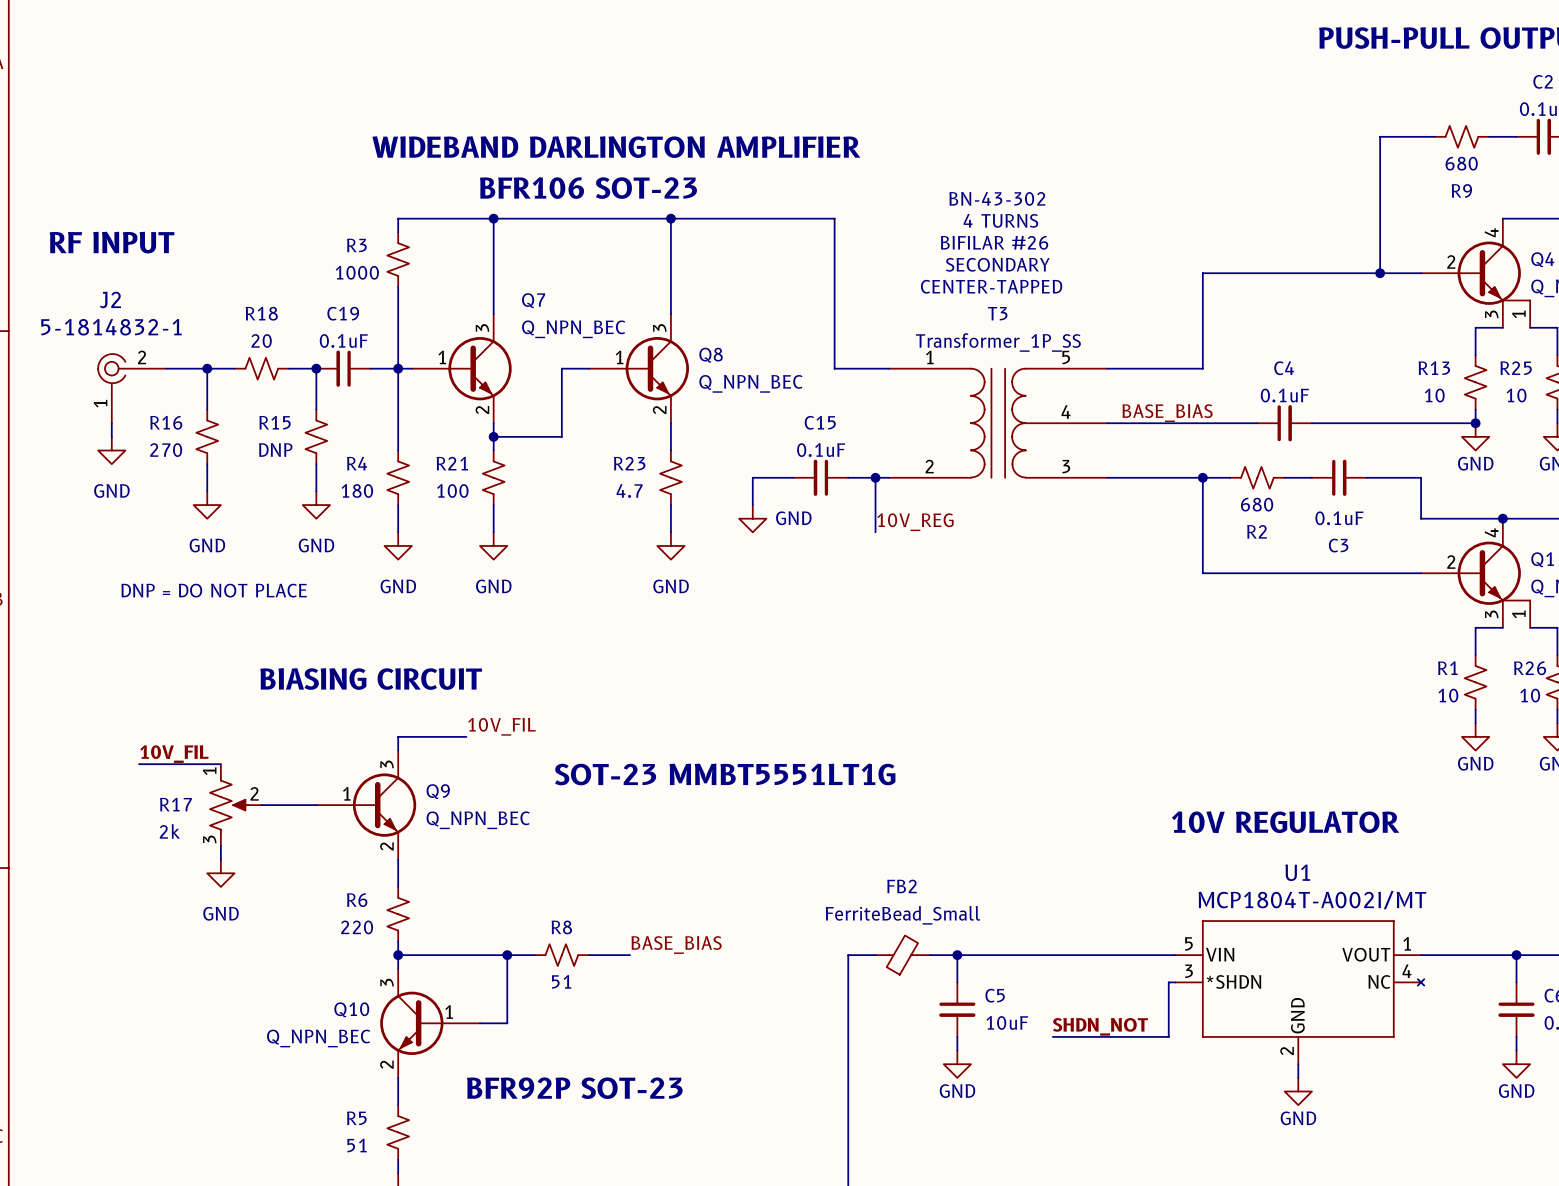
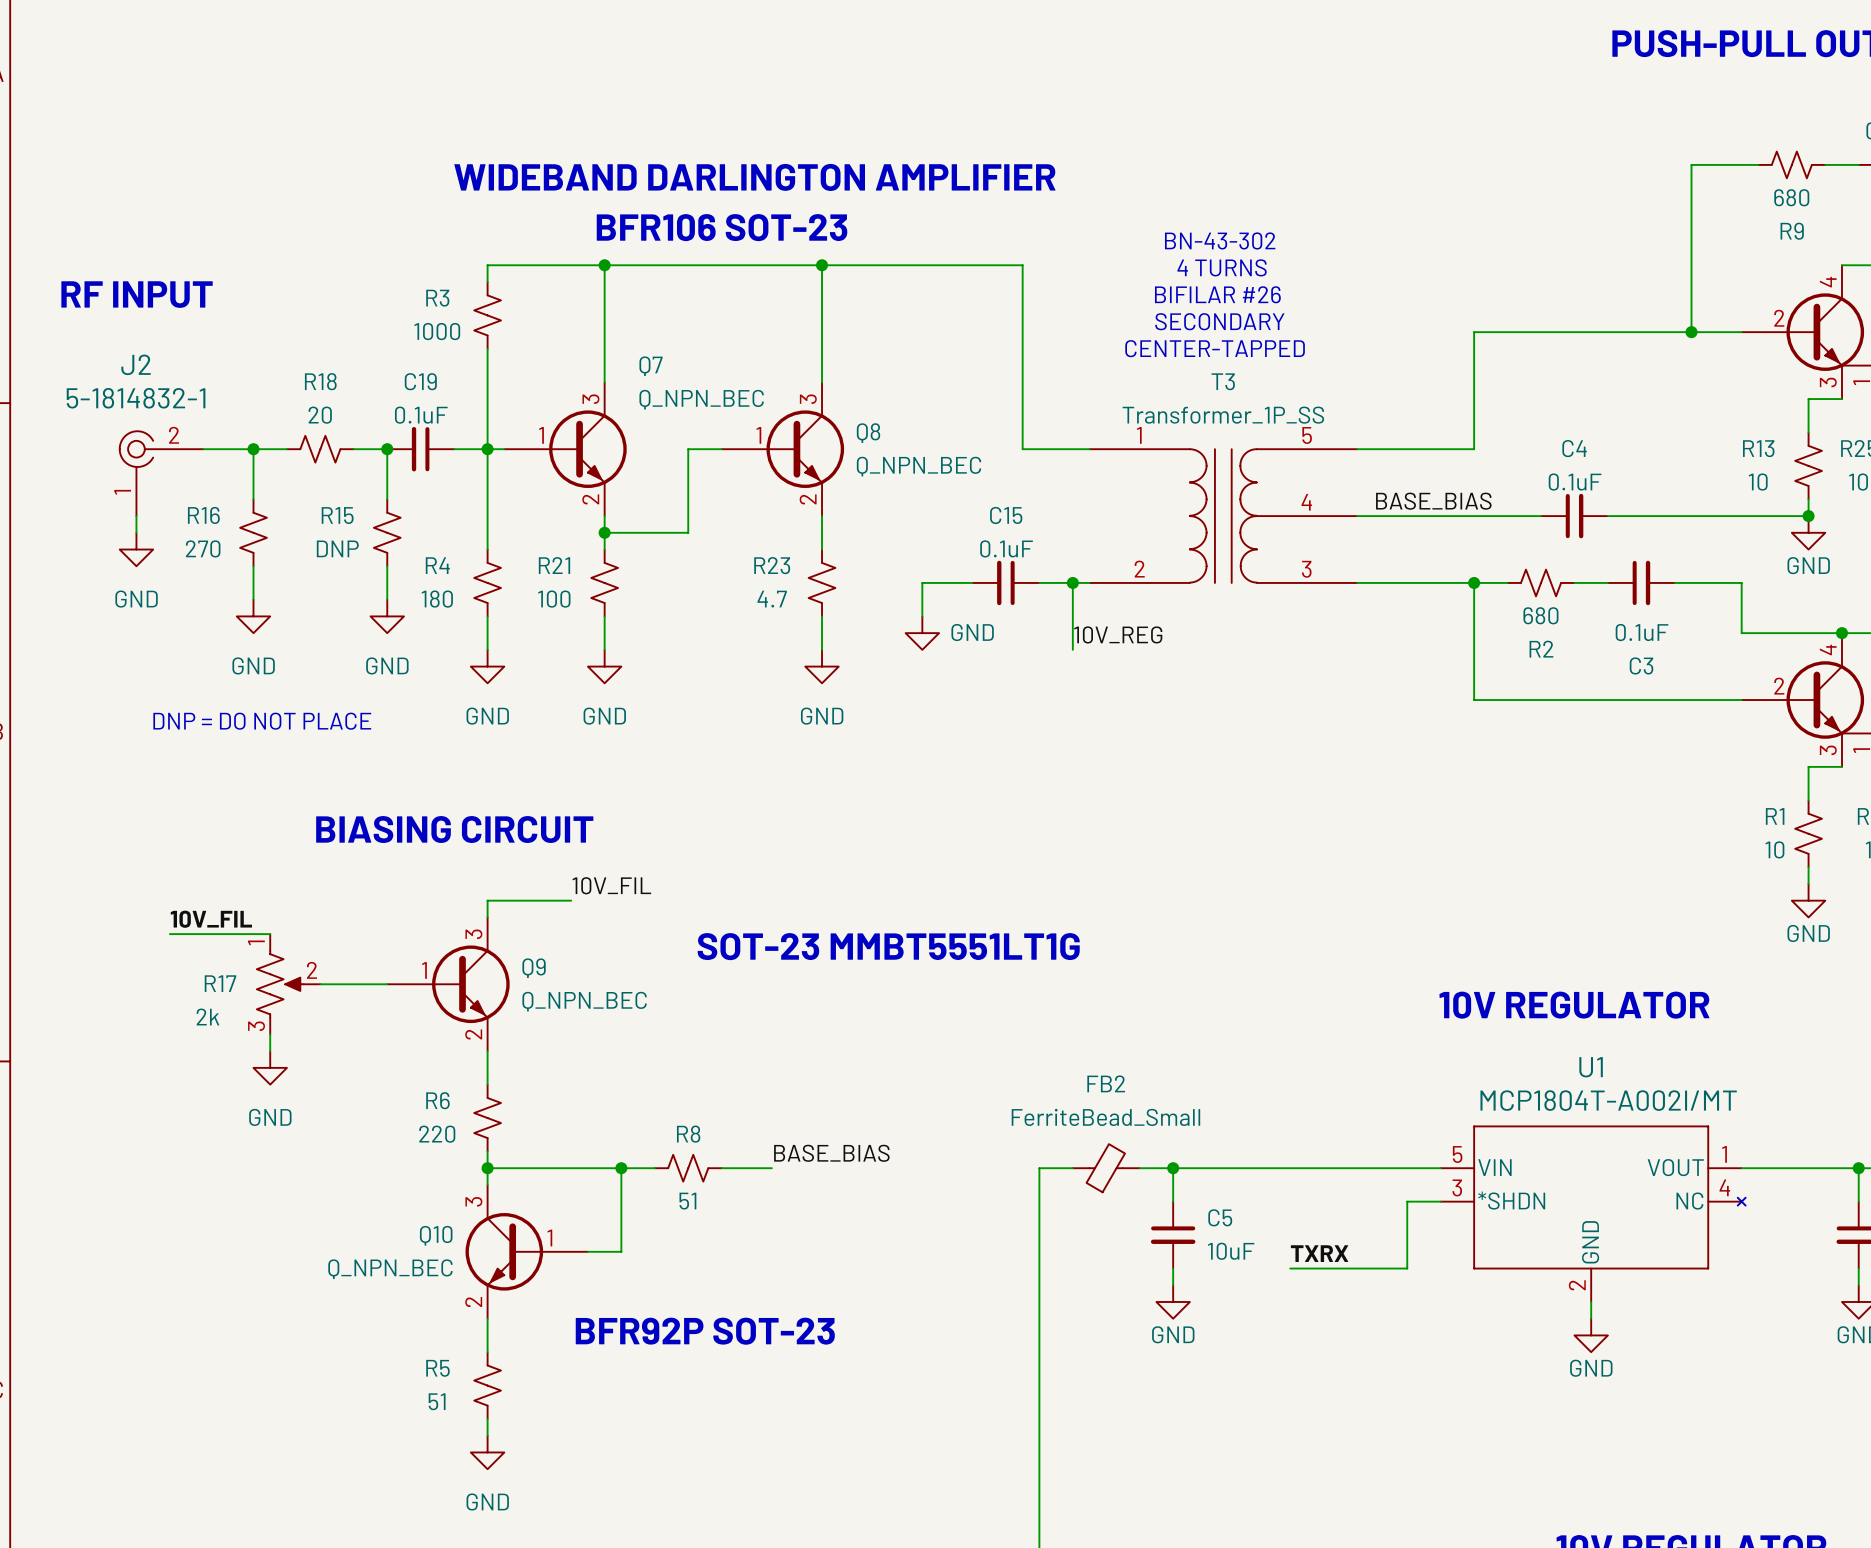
wire: (1168, 982) (1168, 1036) (1148, 1036) -> (1432, 1201) (1407, 1201) (1407, 1268)
label: SHDN_NOT (1100, 1026) -> TXRX (1319, 1253)

